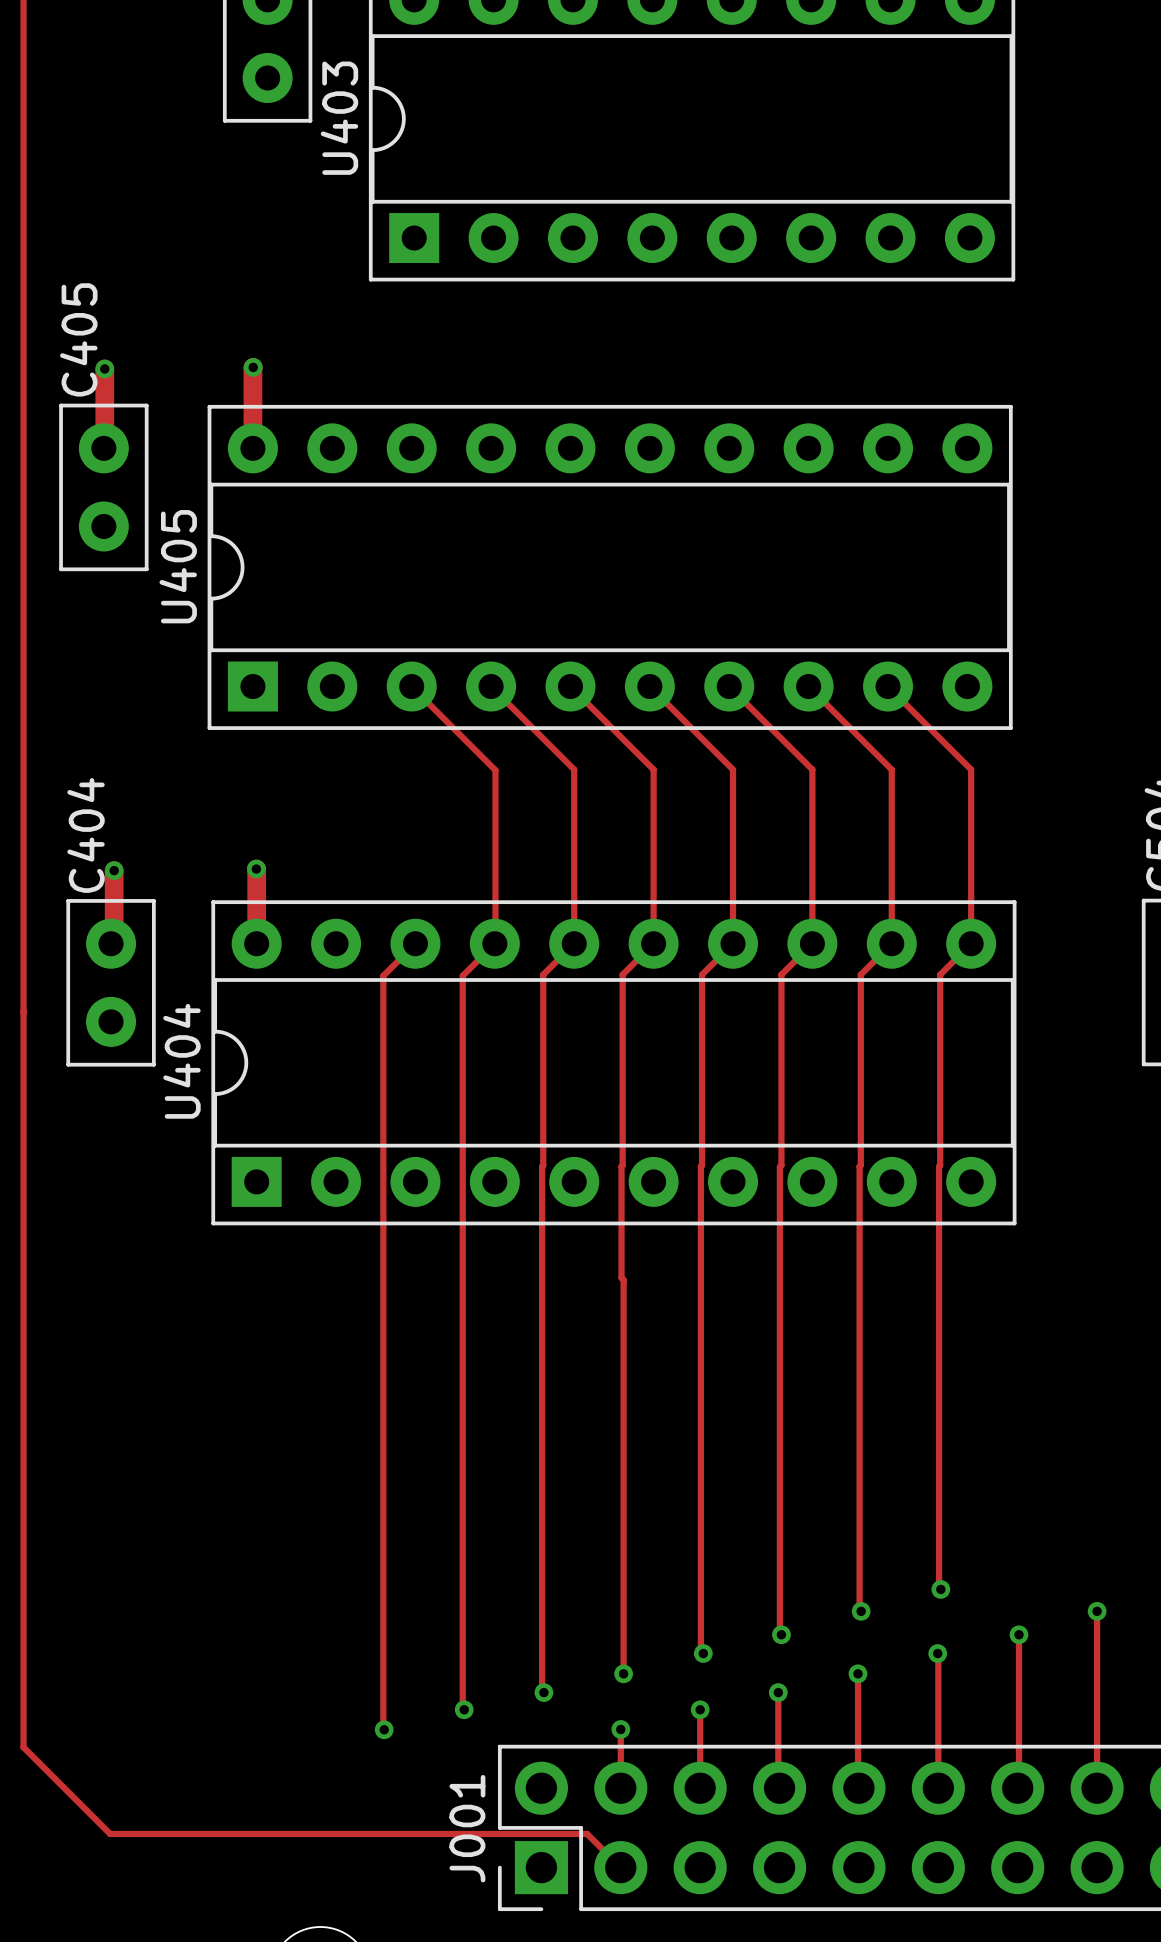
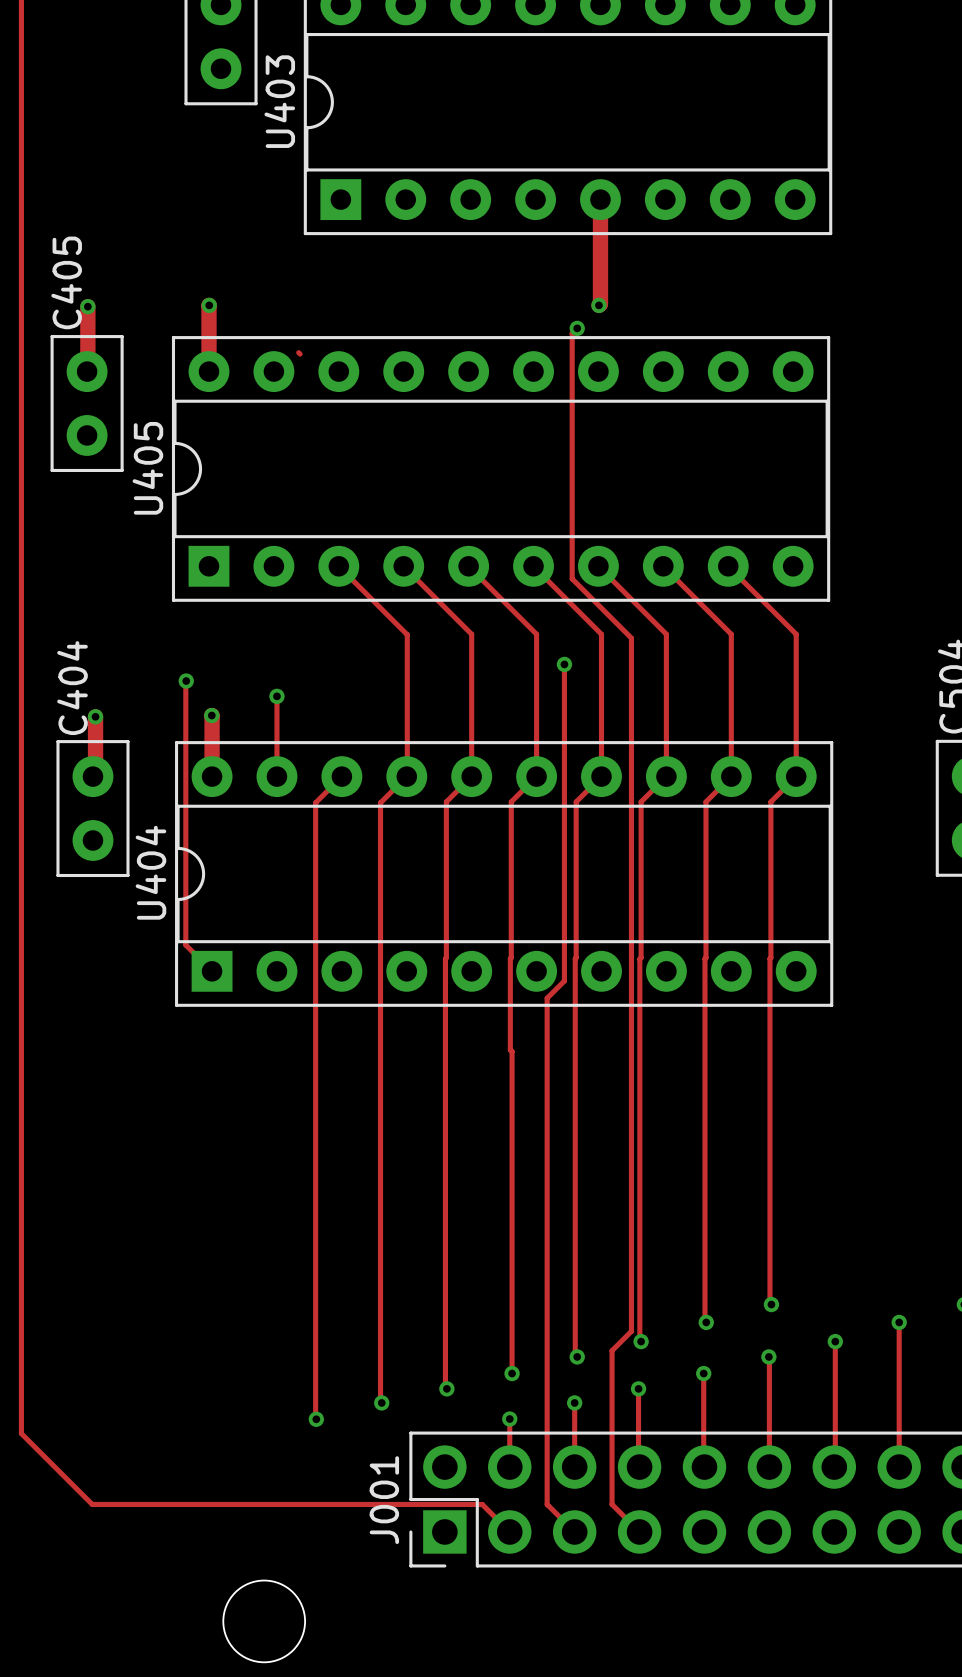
track: none -> (600, 199) (600, 303) (598, 305)
via: none -> (598, 305)
track: none -> (577, 328) (572, 333) (572, 578) (631, 638) (631, 1331) (612, 1350) (612, 1504) (639, 1531)
via: none -> (577, 328)
track: none -> (298, 352) (300, 354)
track: none -> (564, 664) (564, 980) (547, 998) (547, 1504) (574, 1531)
via: none -> (564, 664)
track: none -> (186, 681) (185, 945) (212, 971)
via: none -> (186, 681)
track: none -> (276, 696) (276, 776)
via: none -> (276, 696)

